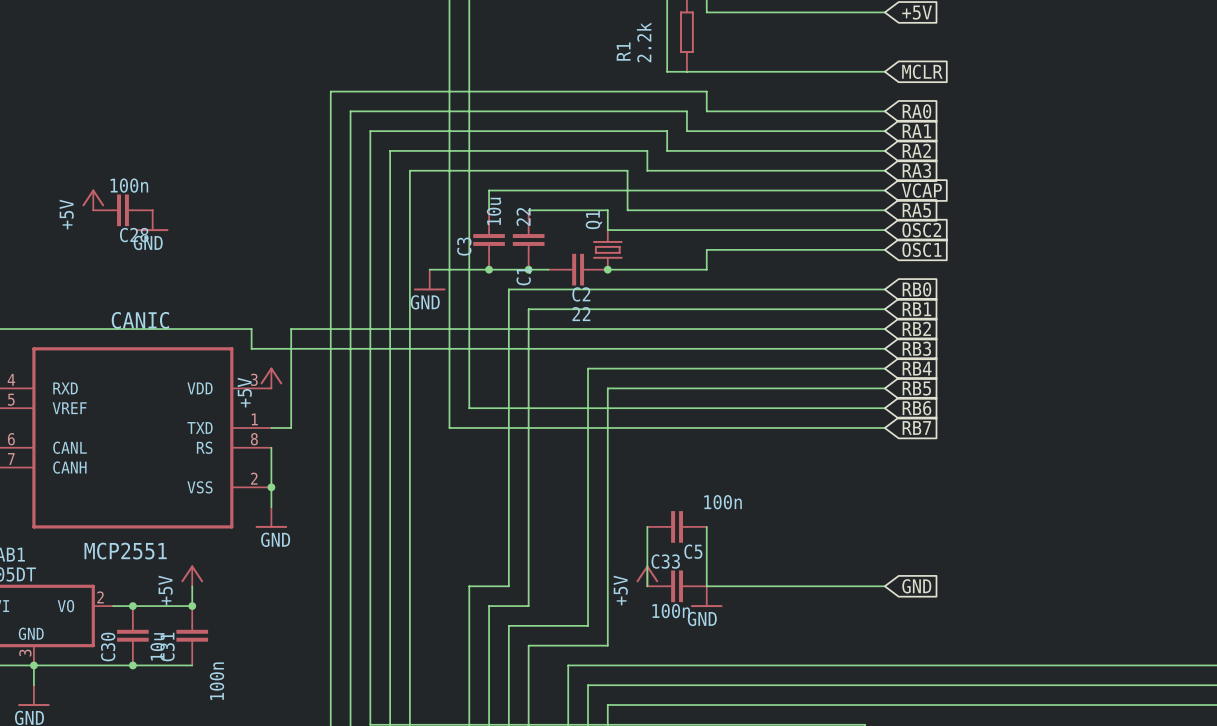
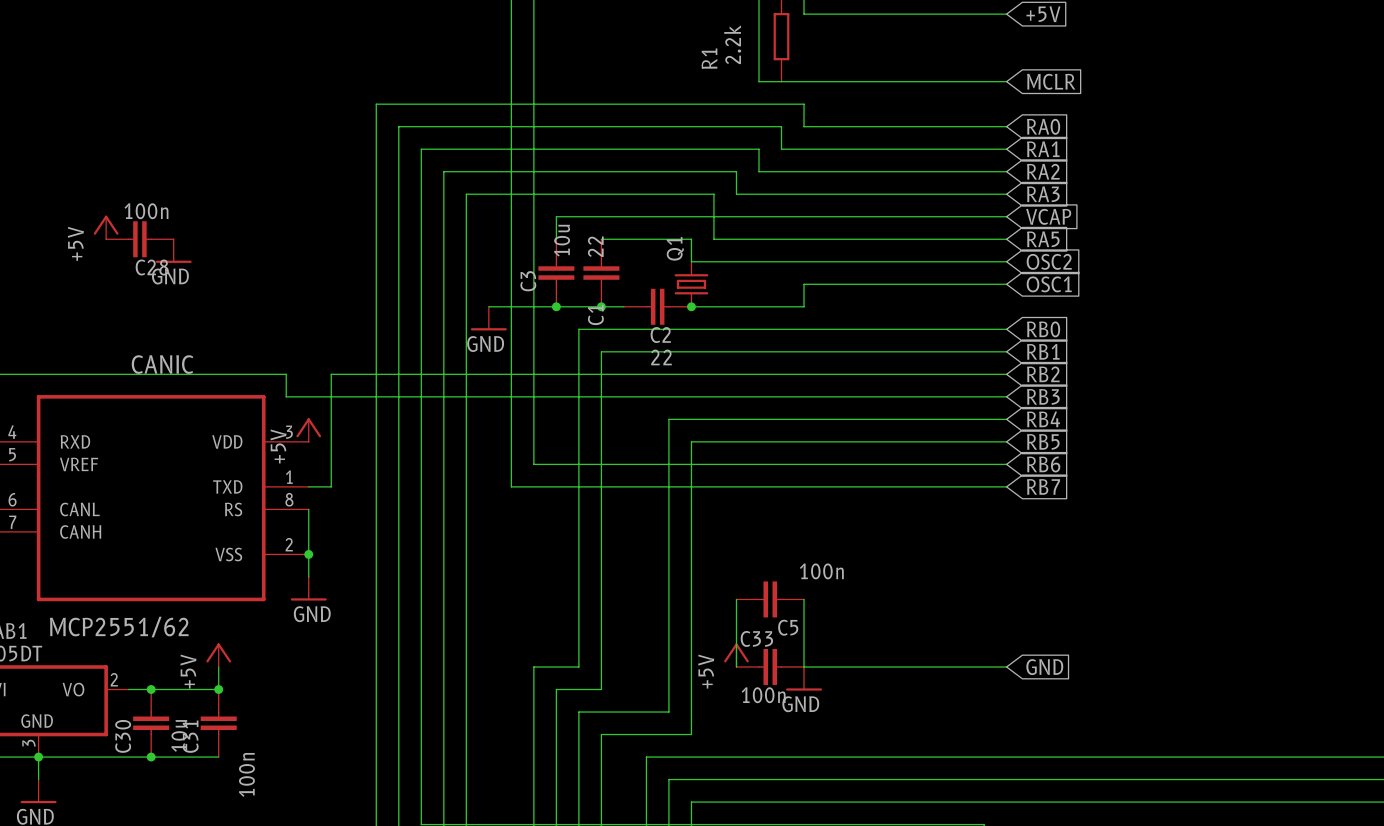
CANIC value: MCP2551 (125, 551) -> MCP2551/62 (119, 627)

